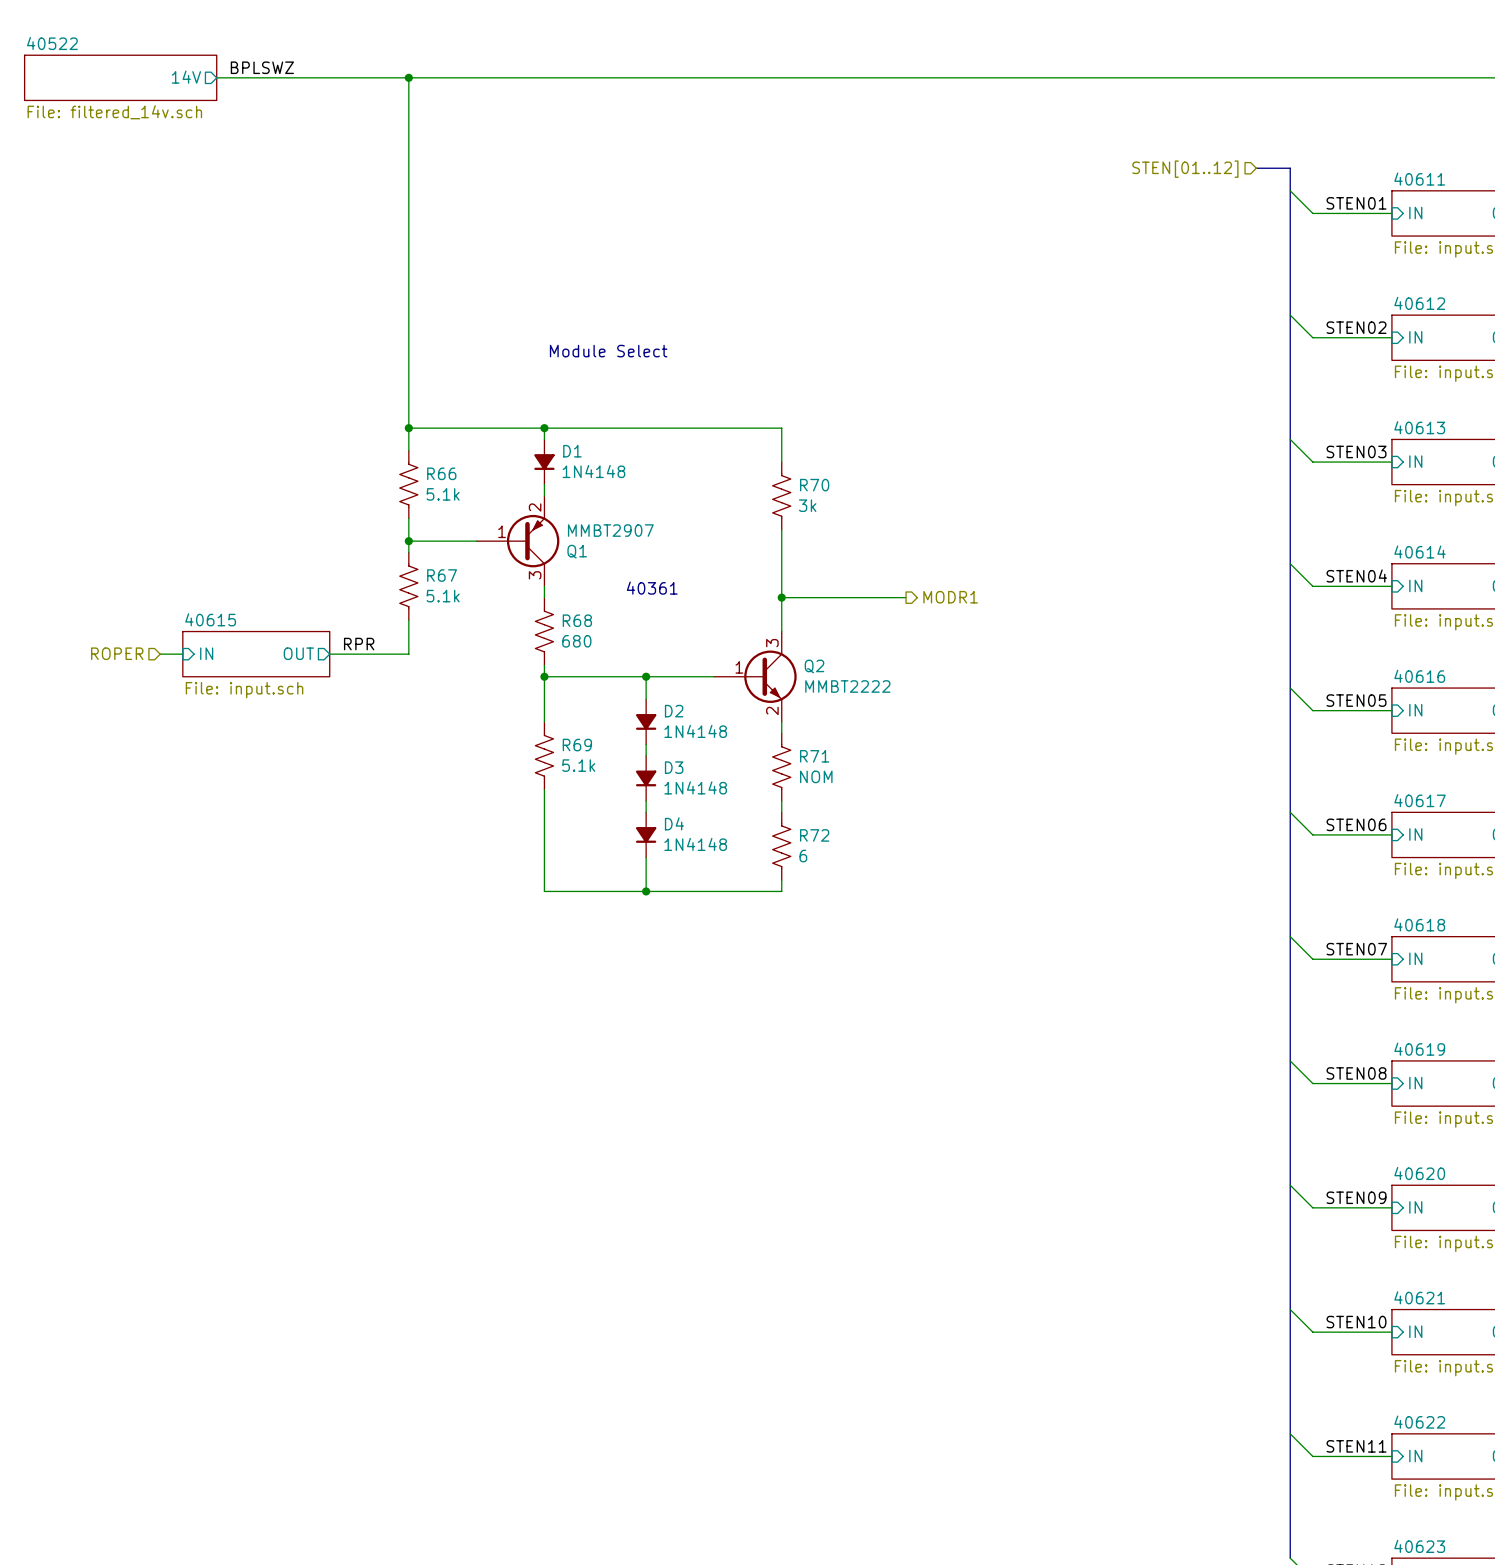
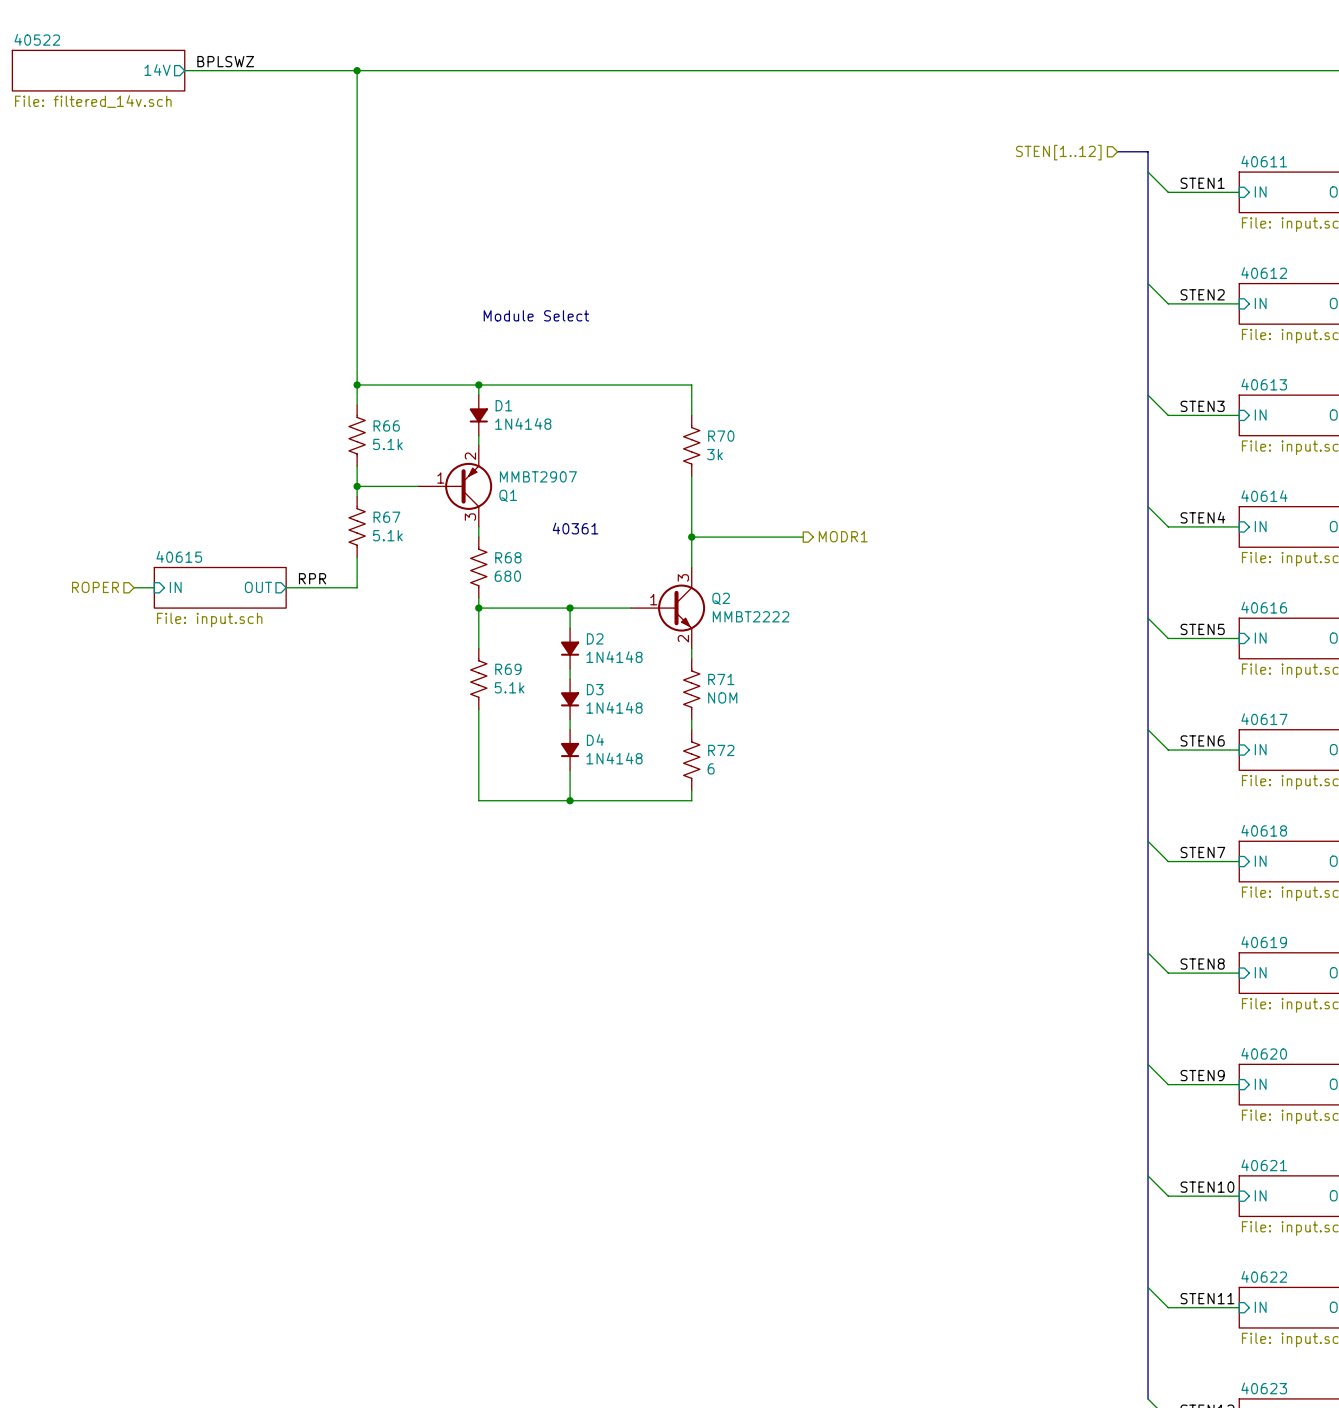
hierarchical label: STEN[01..12] (1185, 169) -> STEN[1..12] (1058, 152)
label: STEN01 (1356, 203) -> STEN1 (1202, 183)
label: STEN02 (1356, 327) -> STEN2 (1202, 294)
label: STEN03 (1356, 451) -> STEN3 (1202, 406)
label: STEN04 (1356, 575) -> STEN4 (1202, 517)
label: STEN05 (1356, 700) -> STEN5 (1202, 629)
label: STEN06 (1356, 824) -> STEN6 (1202, 740)
label: STEN07 (1356, 949) -> STEN7 (1202, 852)
label: STEN08 (1356, 1073) -> STEN8 (1202, 964)
label: STEN09 (1356, 1197) -> STEN9 (1202, 1075)

